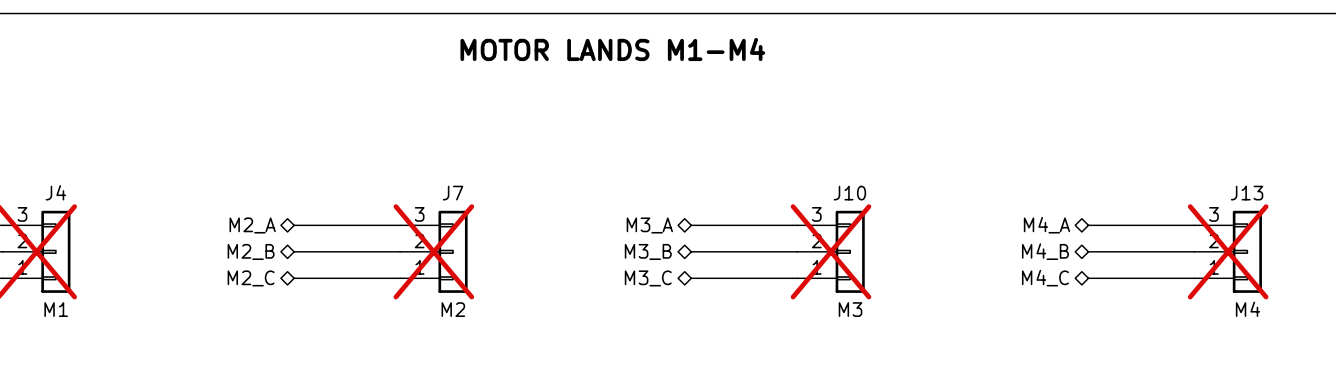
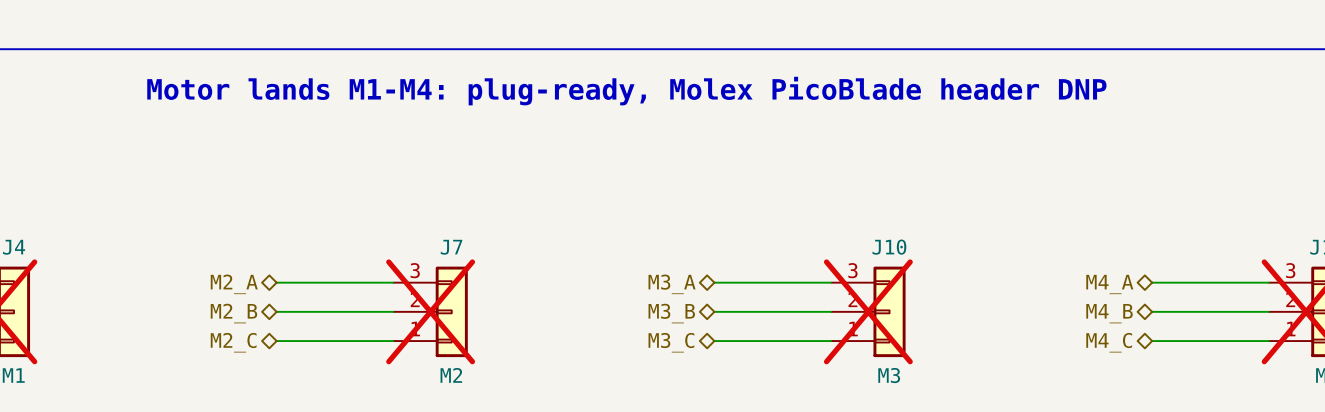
text: MOTOR LANDS M1-M4 (612, 49) -> Motor lands M1-M4: plug-ready, Molex PicoBlade header DNP (626, 91)

